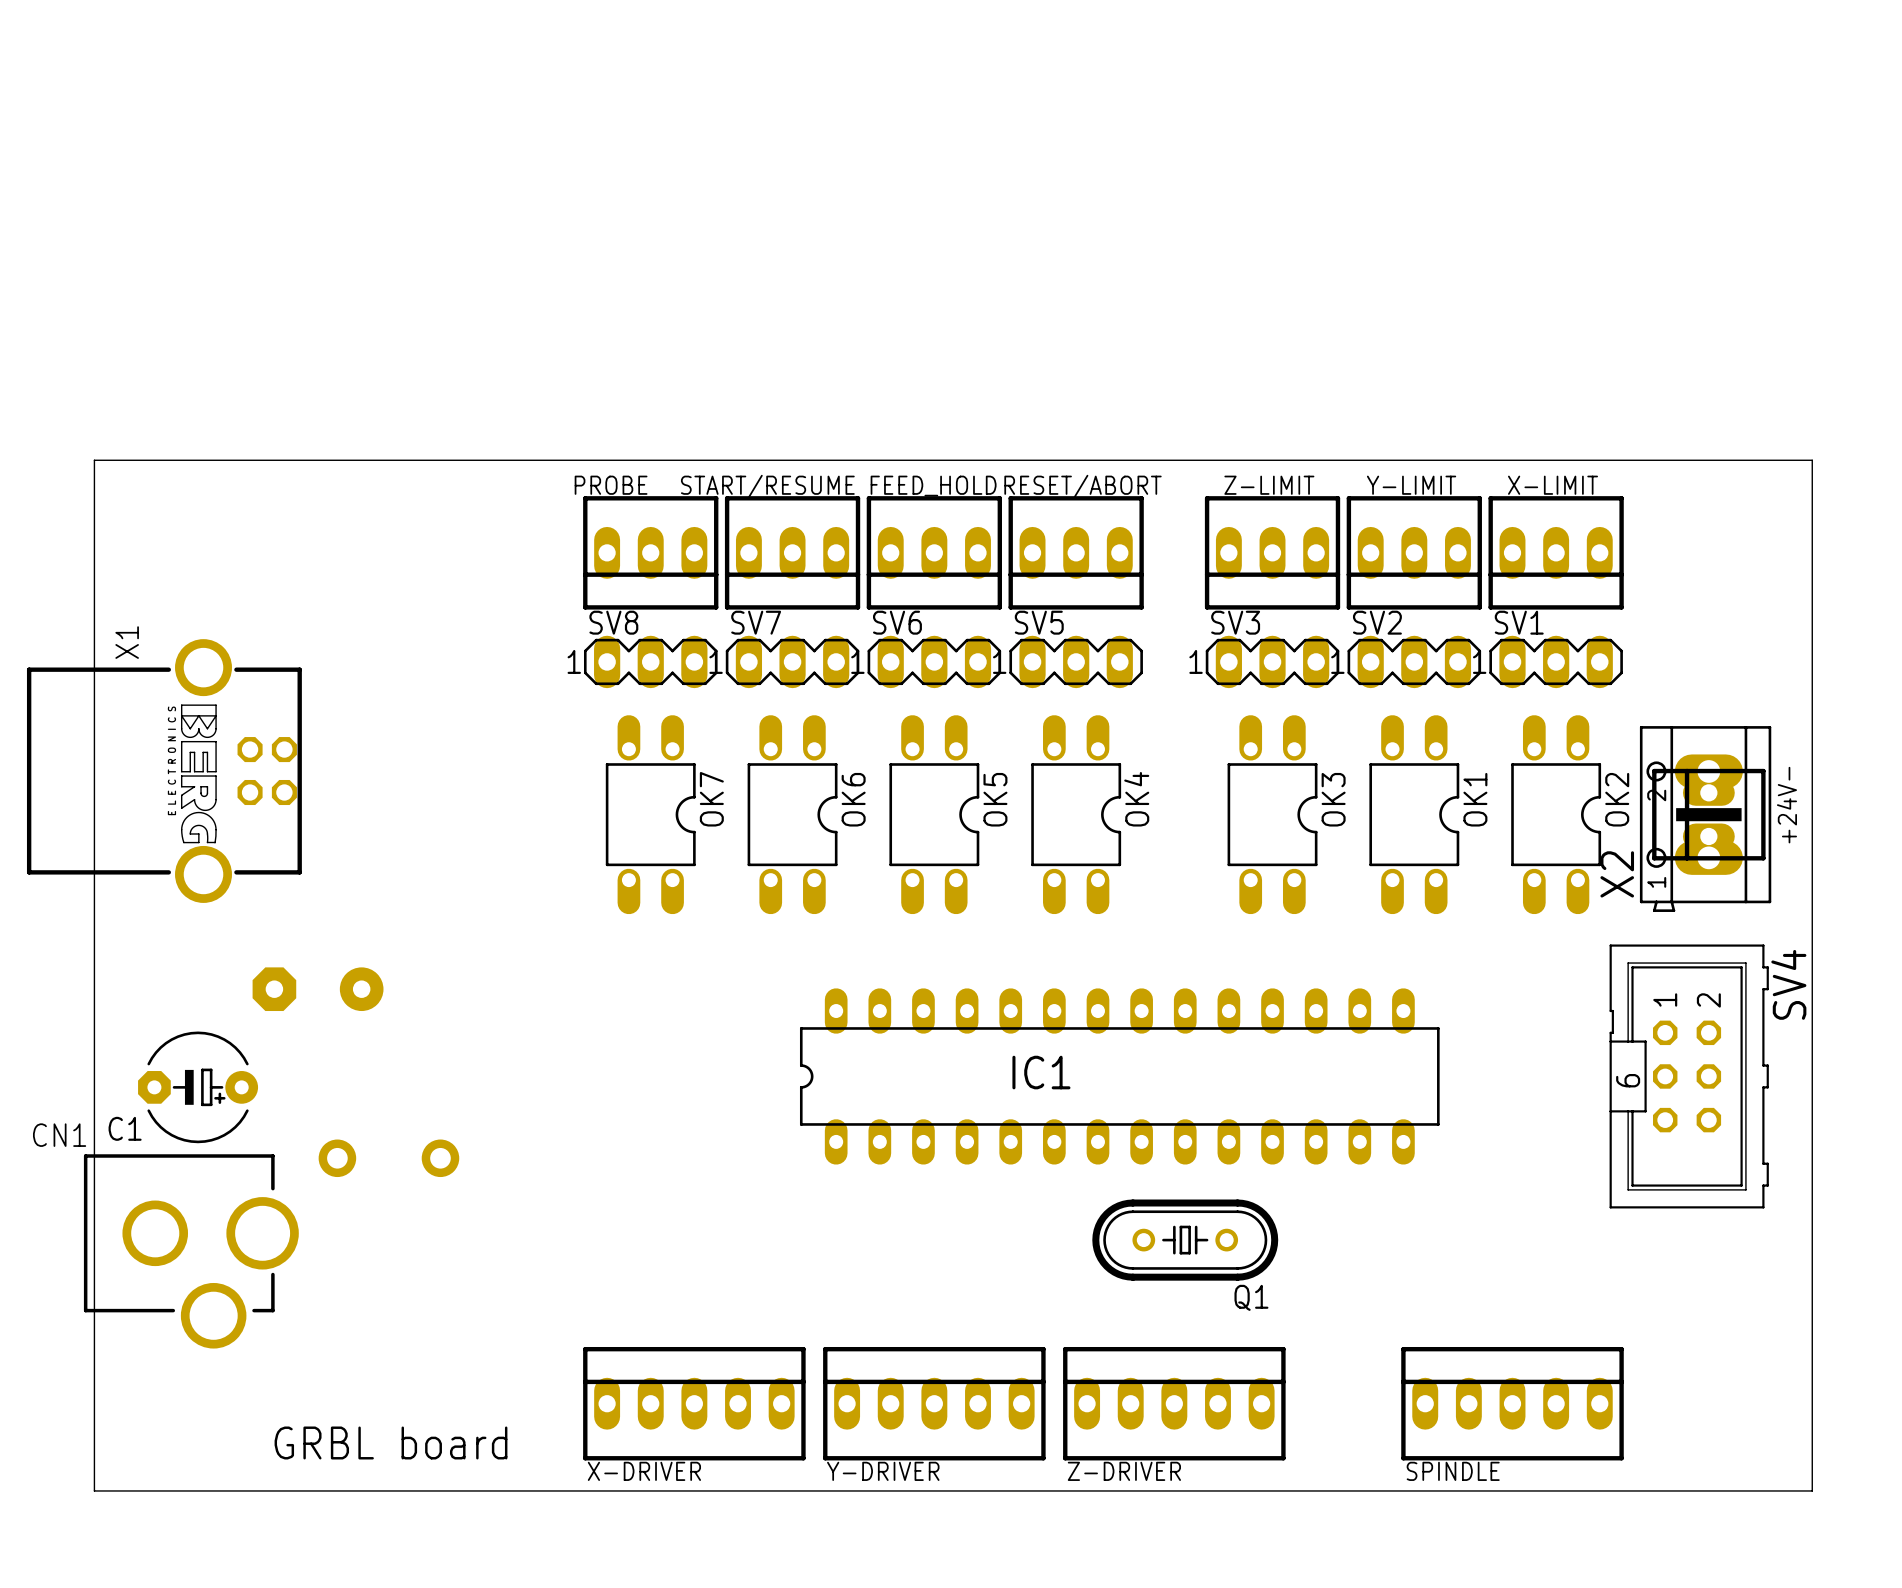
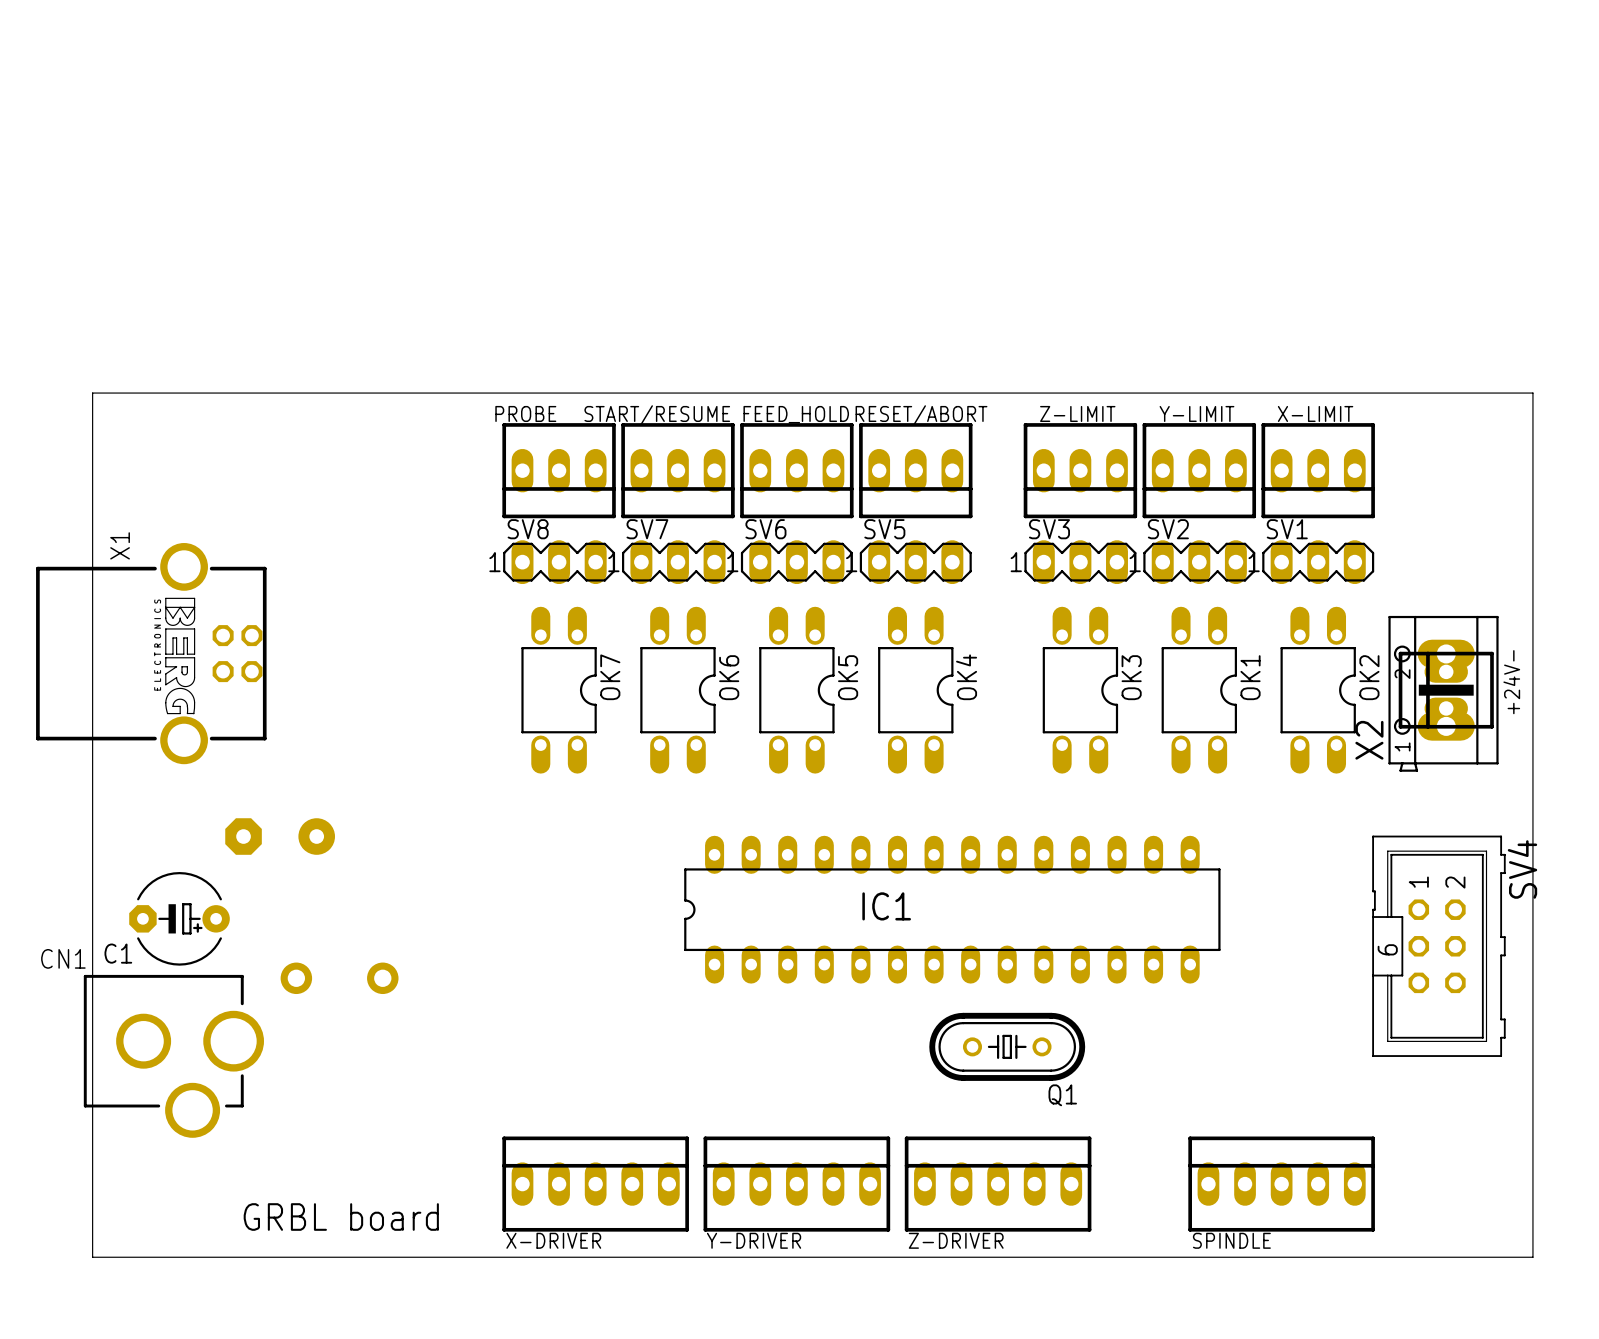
SV4 position: (1689, 1076) -> (1438, 946)

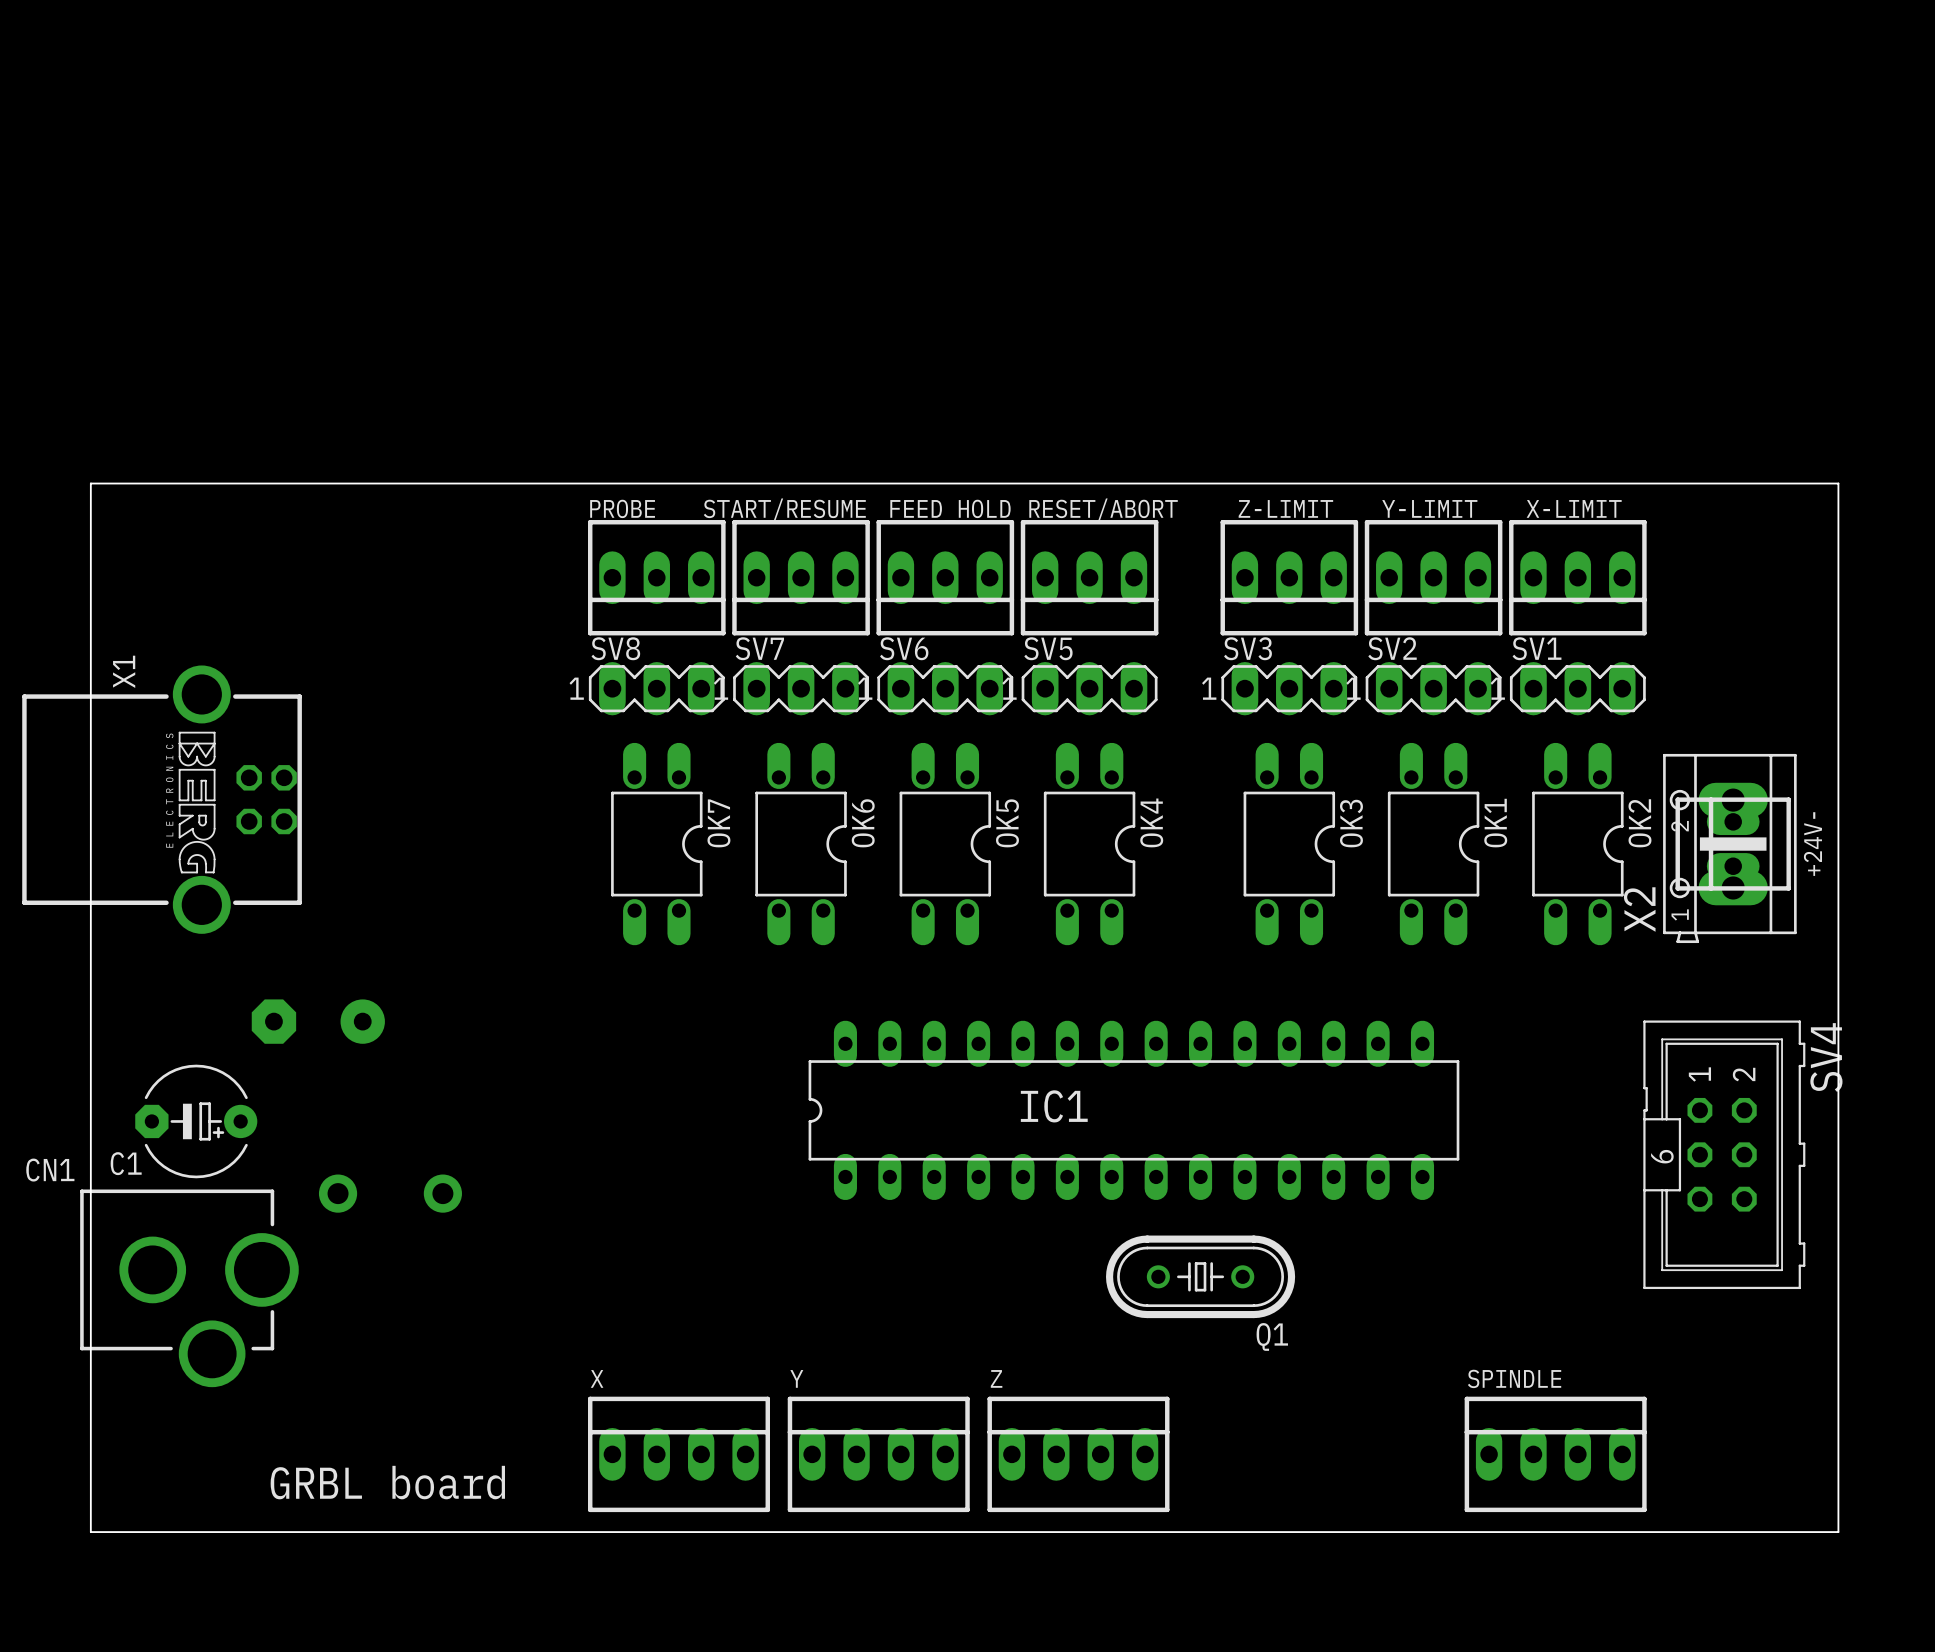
X-DRIVER: (595, 1184) -> none
Y-DRIVER: (796, 1184) -> none
Z-DRIVER: (998, 1184) -> none
SPINDLE: (1281, 1184) -> none
X: none -> (678, 1454)
Y: none -> (878, 1454)
Z: none -> (1078, 1454)
SPINDLE: none -> (1555, 1454)

